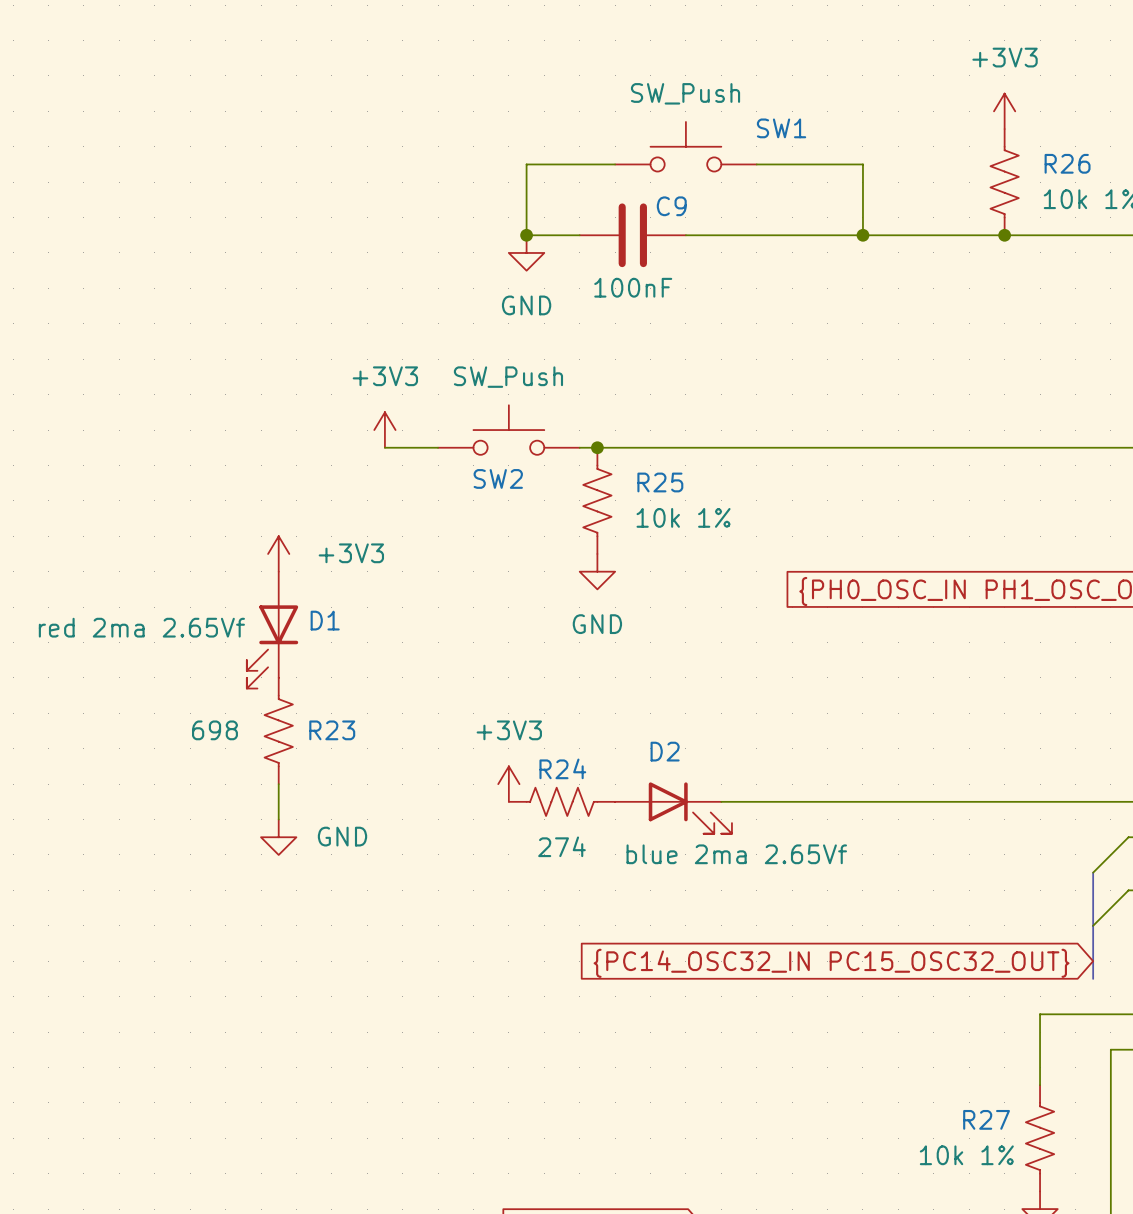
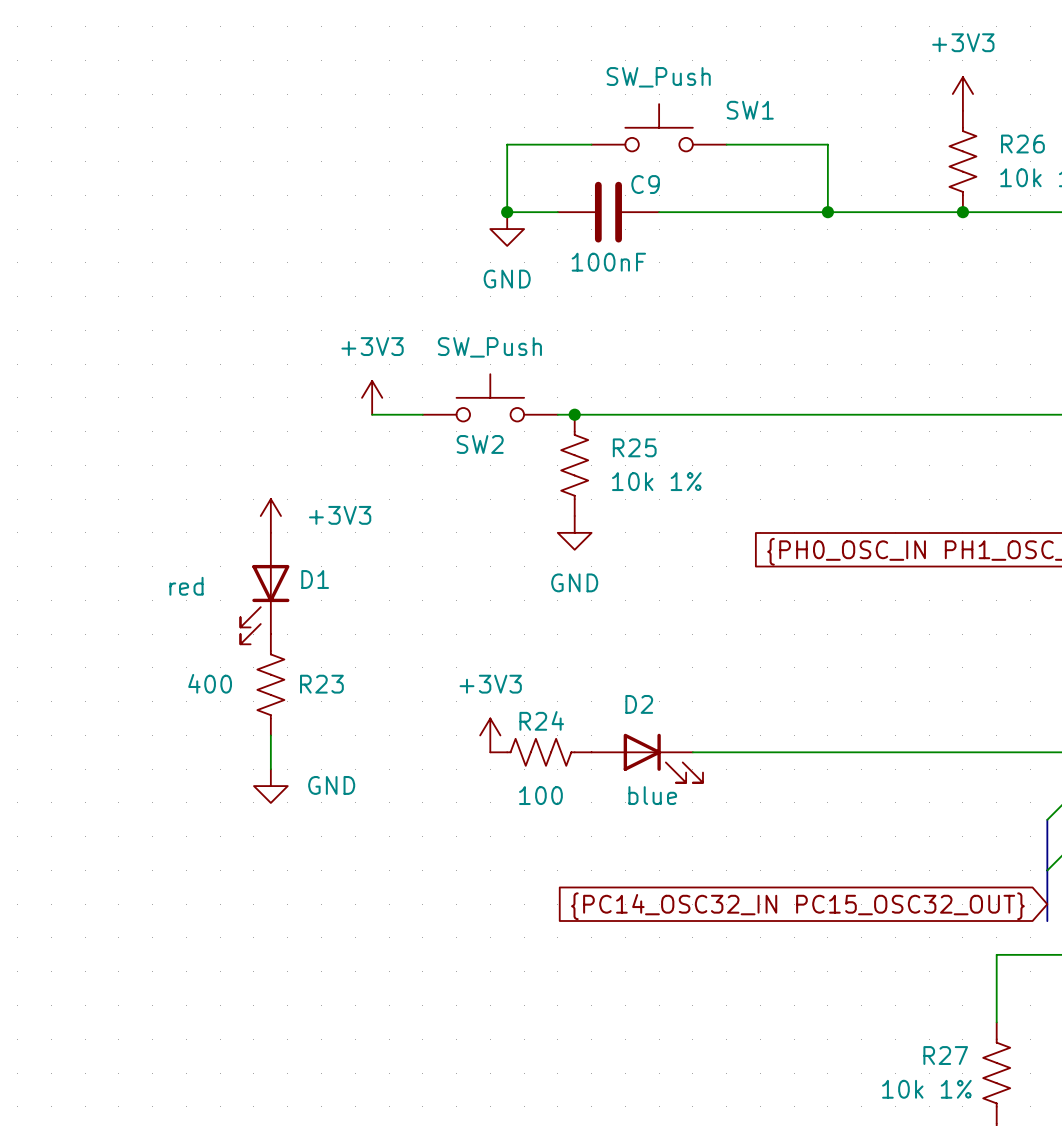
D1 value: red 2ma 2.65Vf (141, 627) -> red (186, 586)
R23 value: 698 (214, 730) -> 400 (210, 683)
R24 value: 274 (561, 846) -> 100 (540, 795)
D2 value: blue 2ma 2.65Vf (736, 854) -> blue (652, 795)

